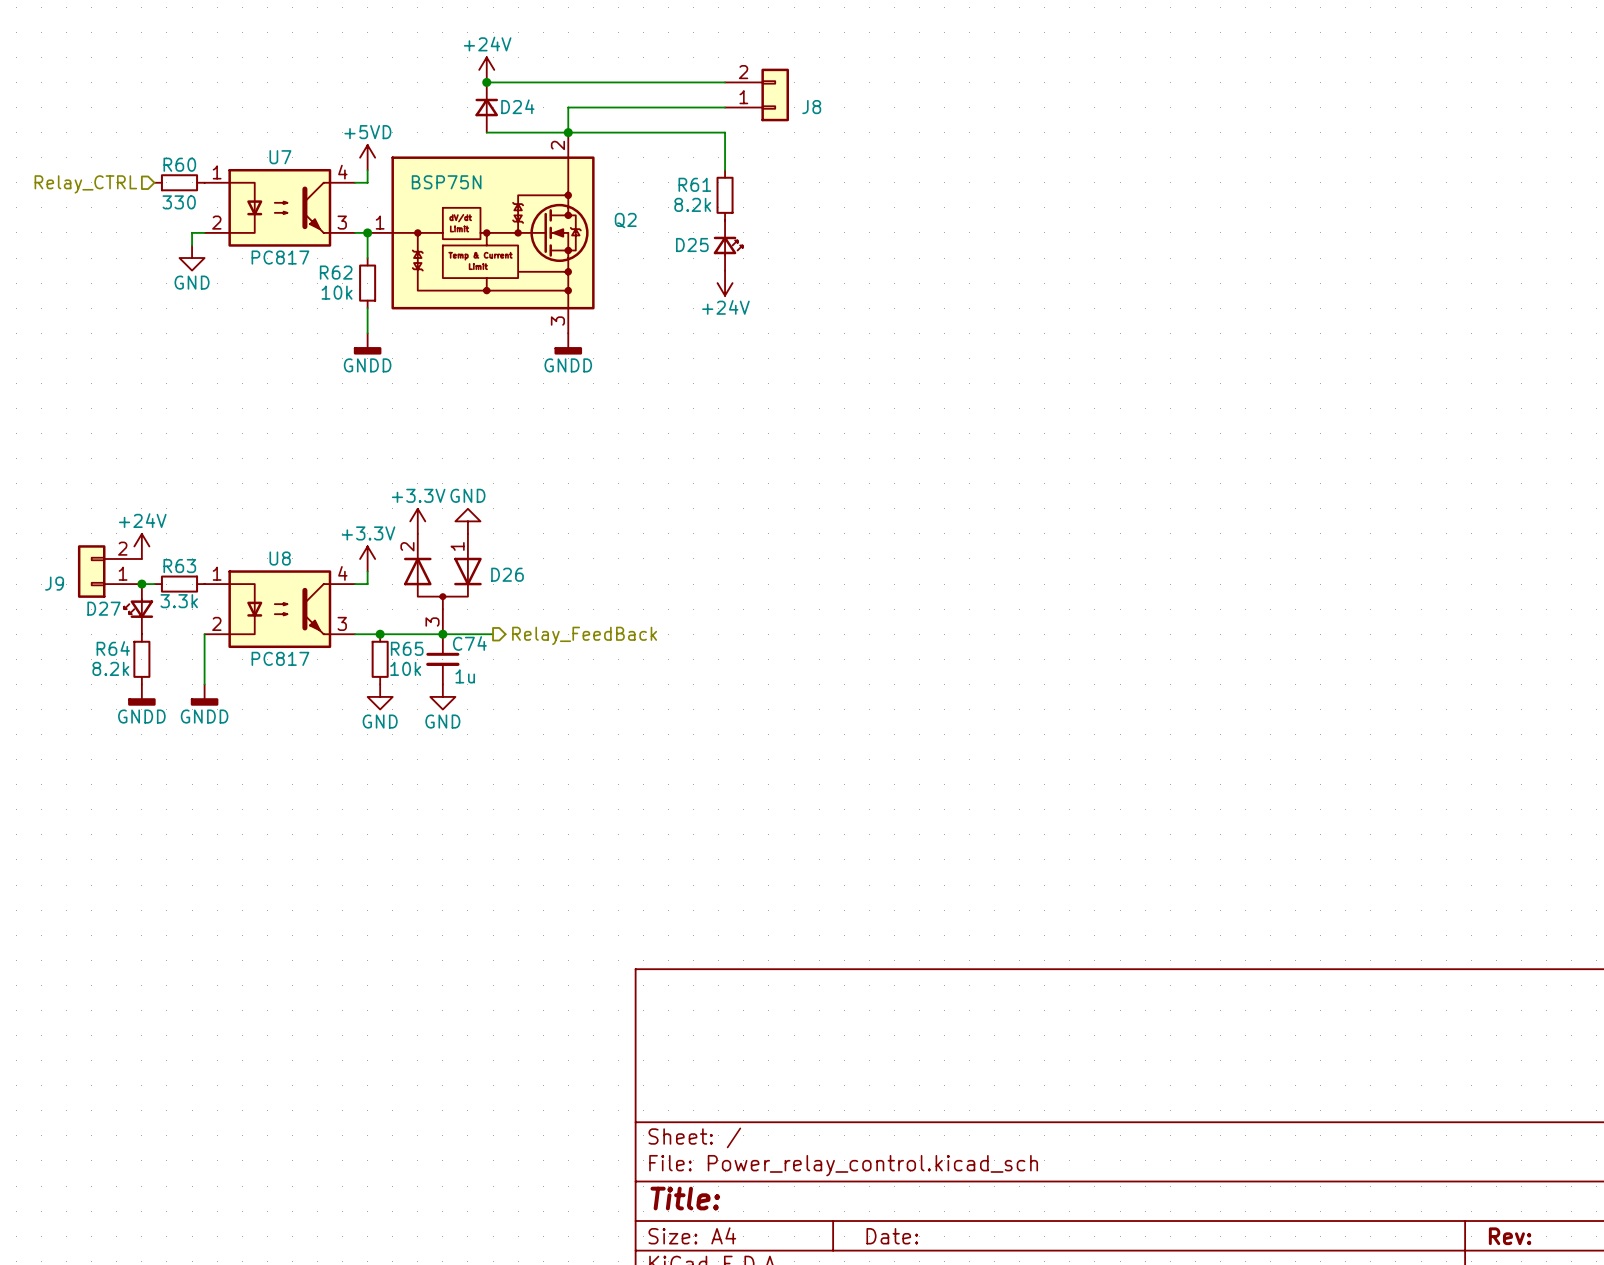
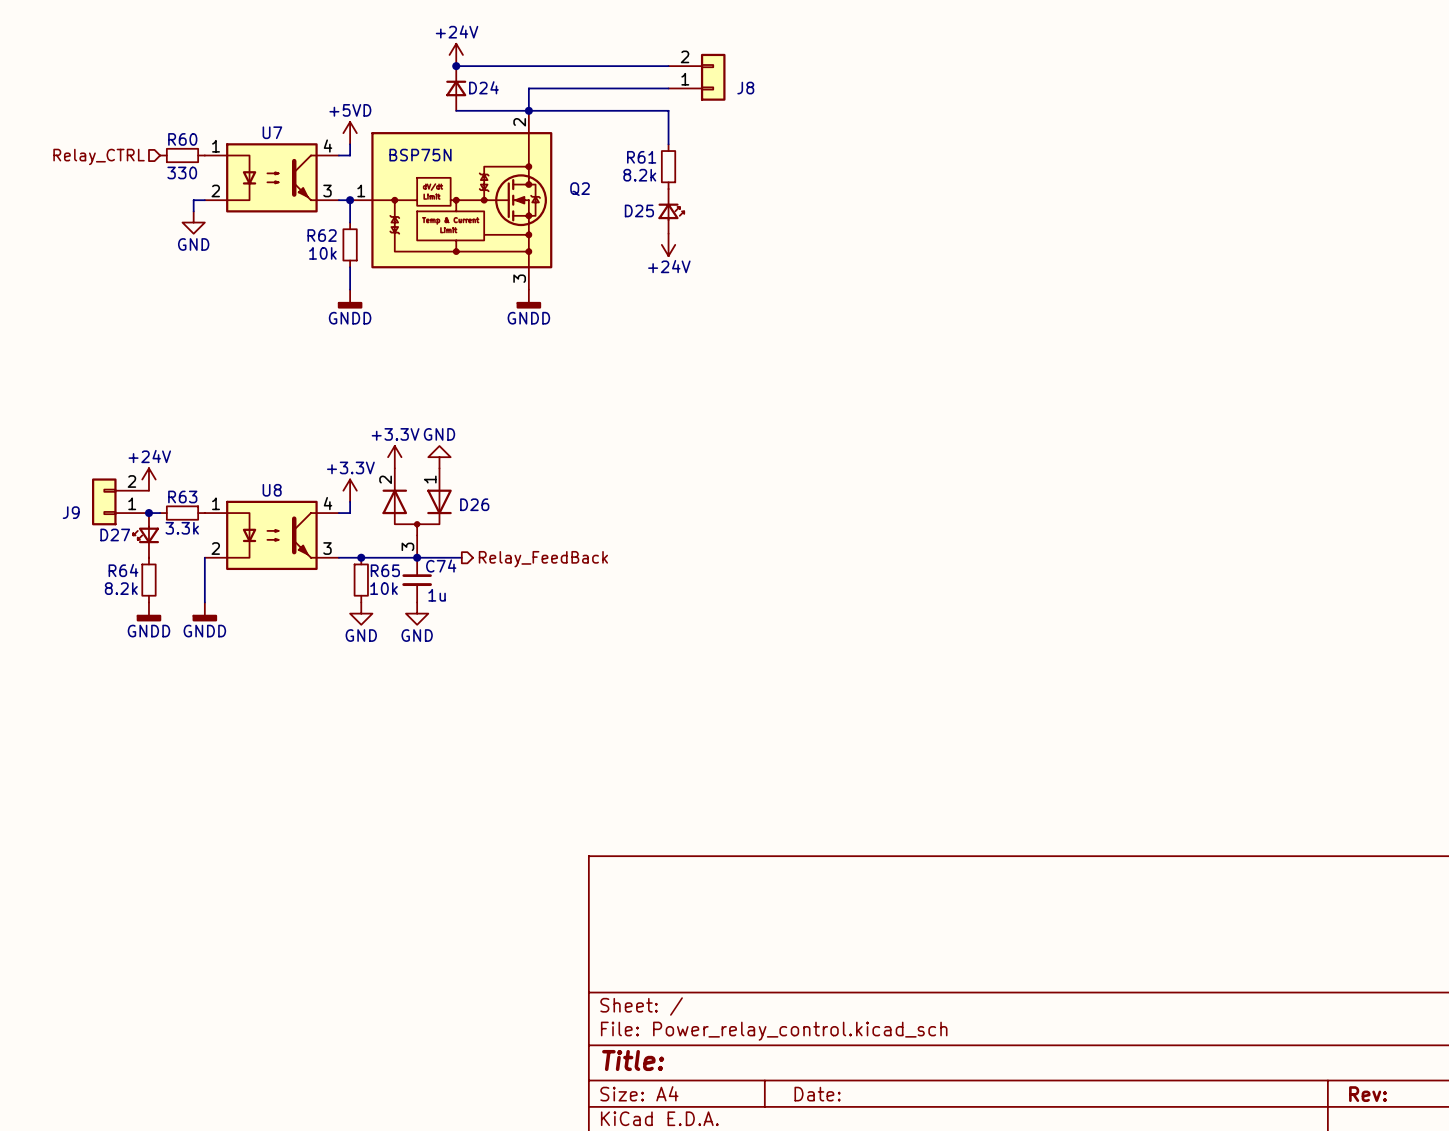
U7 value: PC817 (280, 257) -> none
U8 value: PC817 (280, 658) -> none

